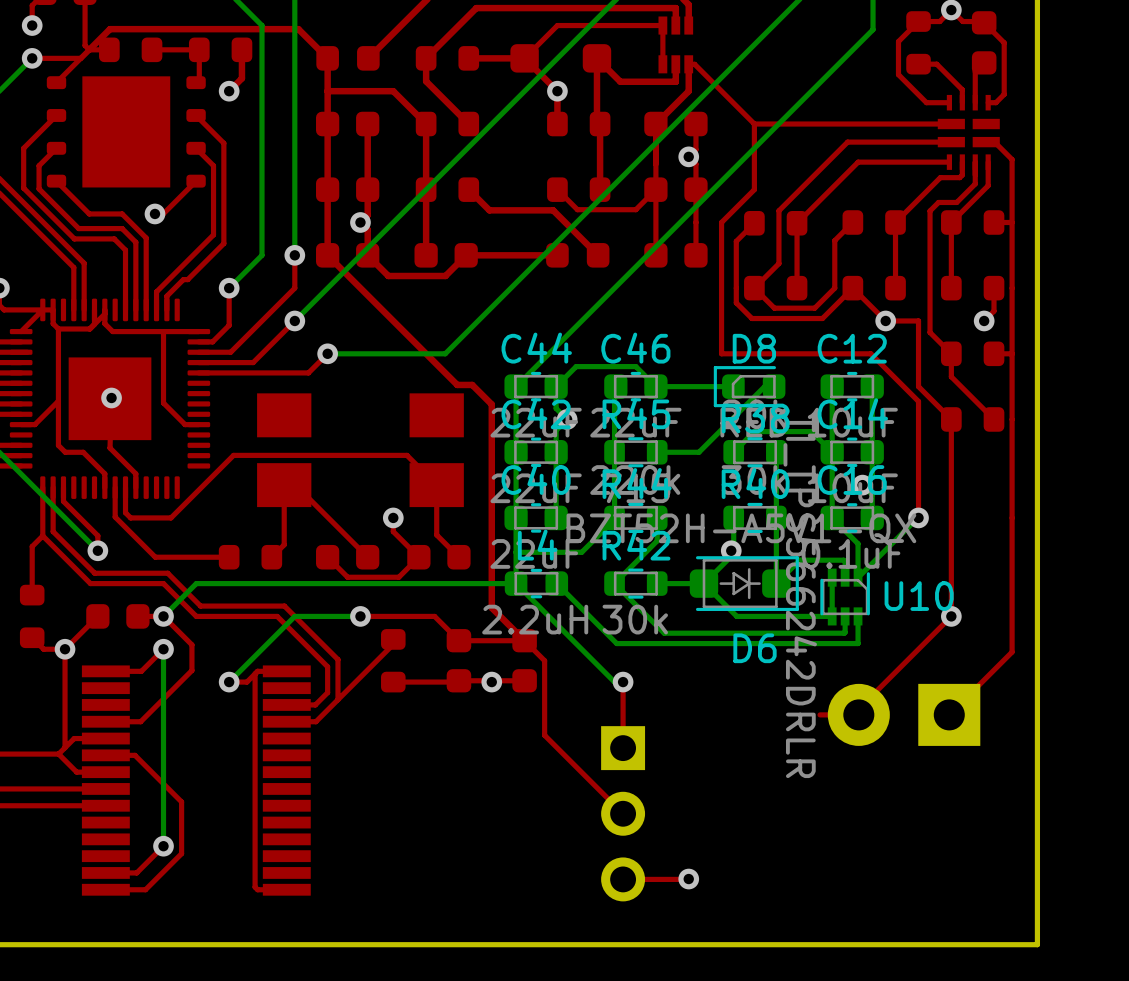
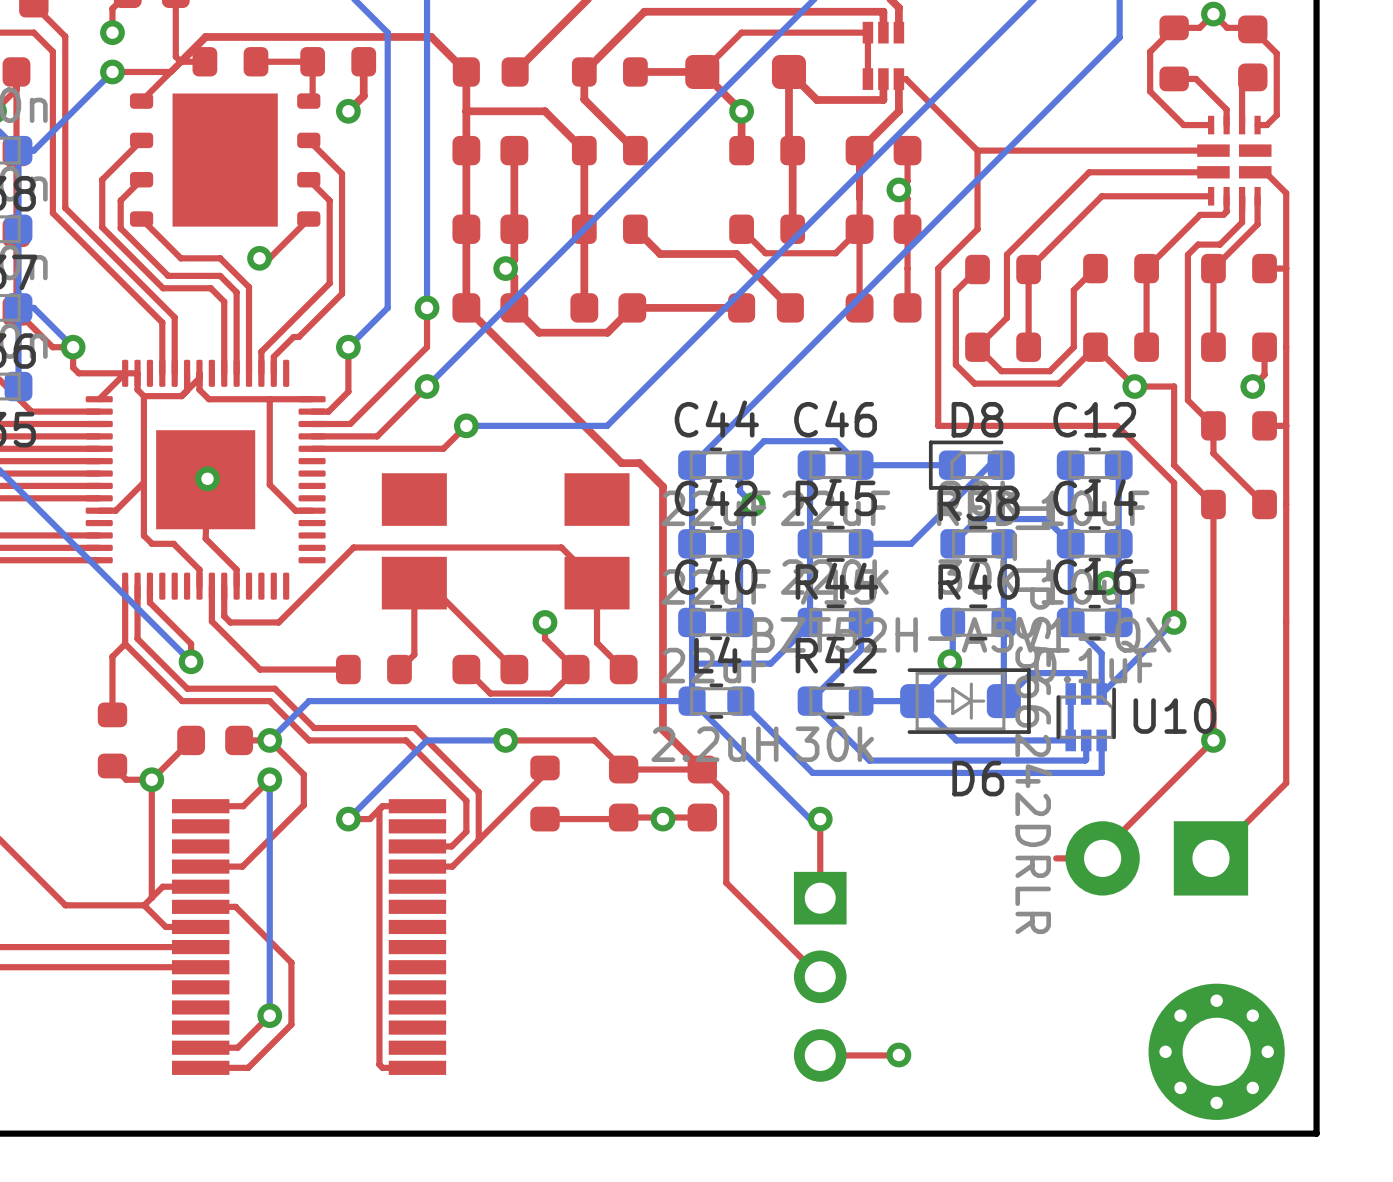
part: none -> (1216, 1051)

